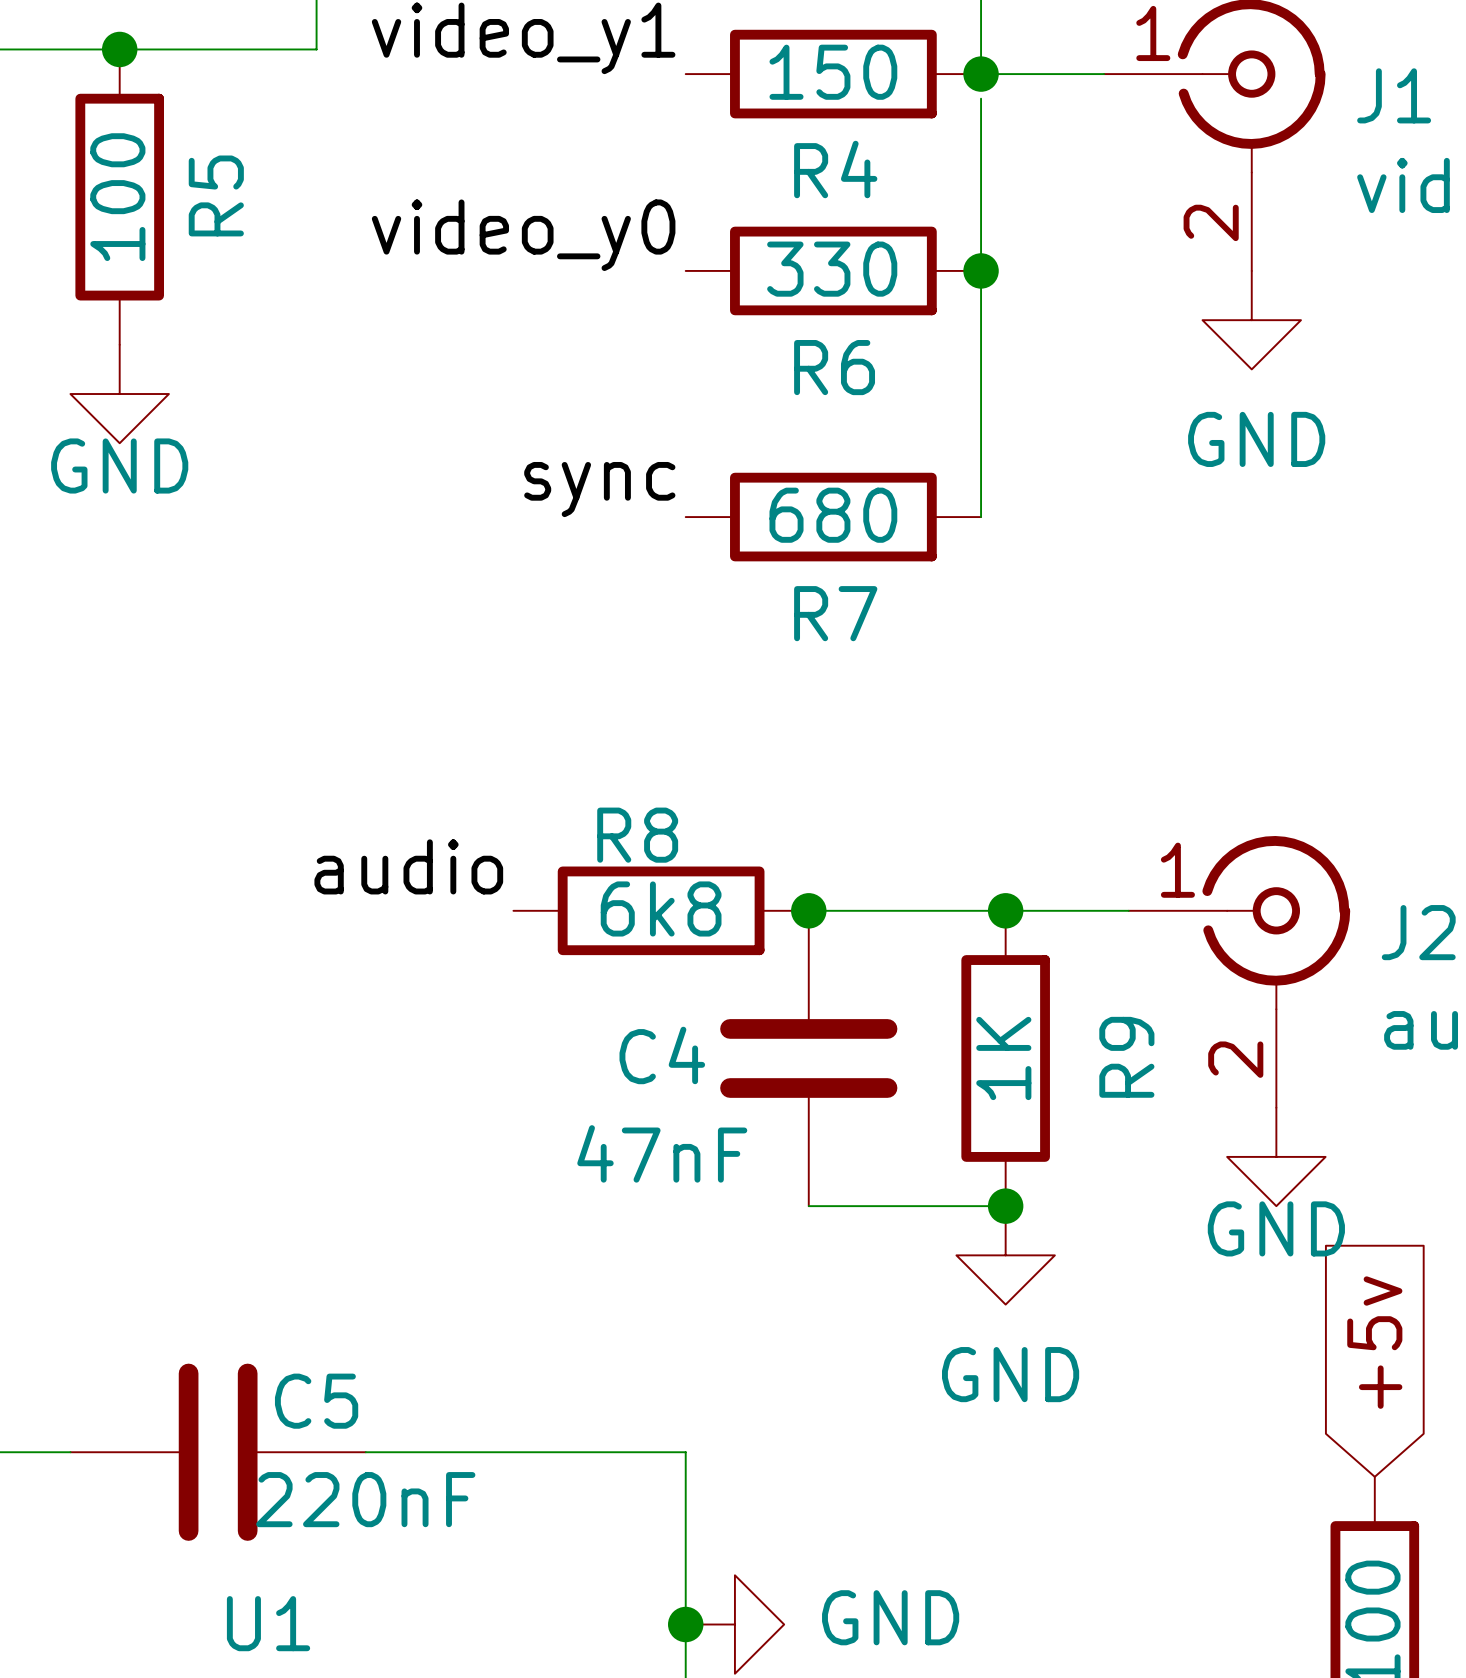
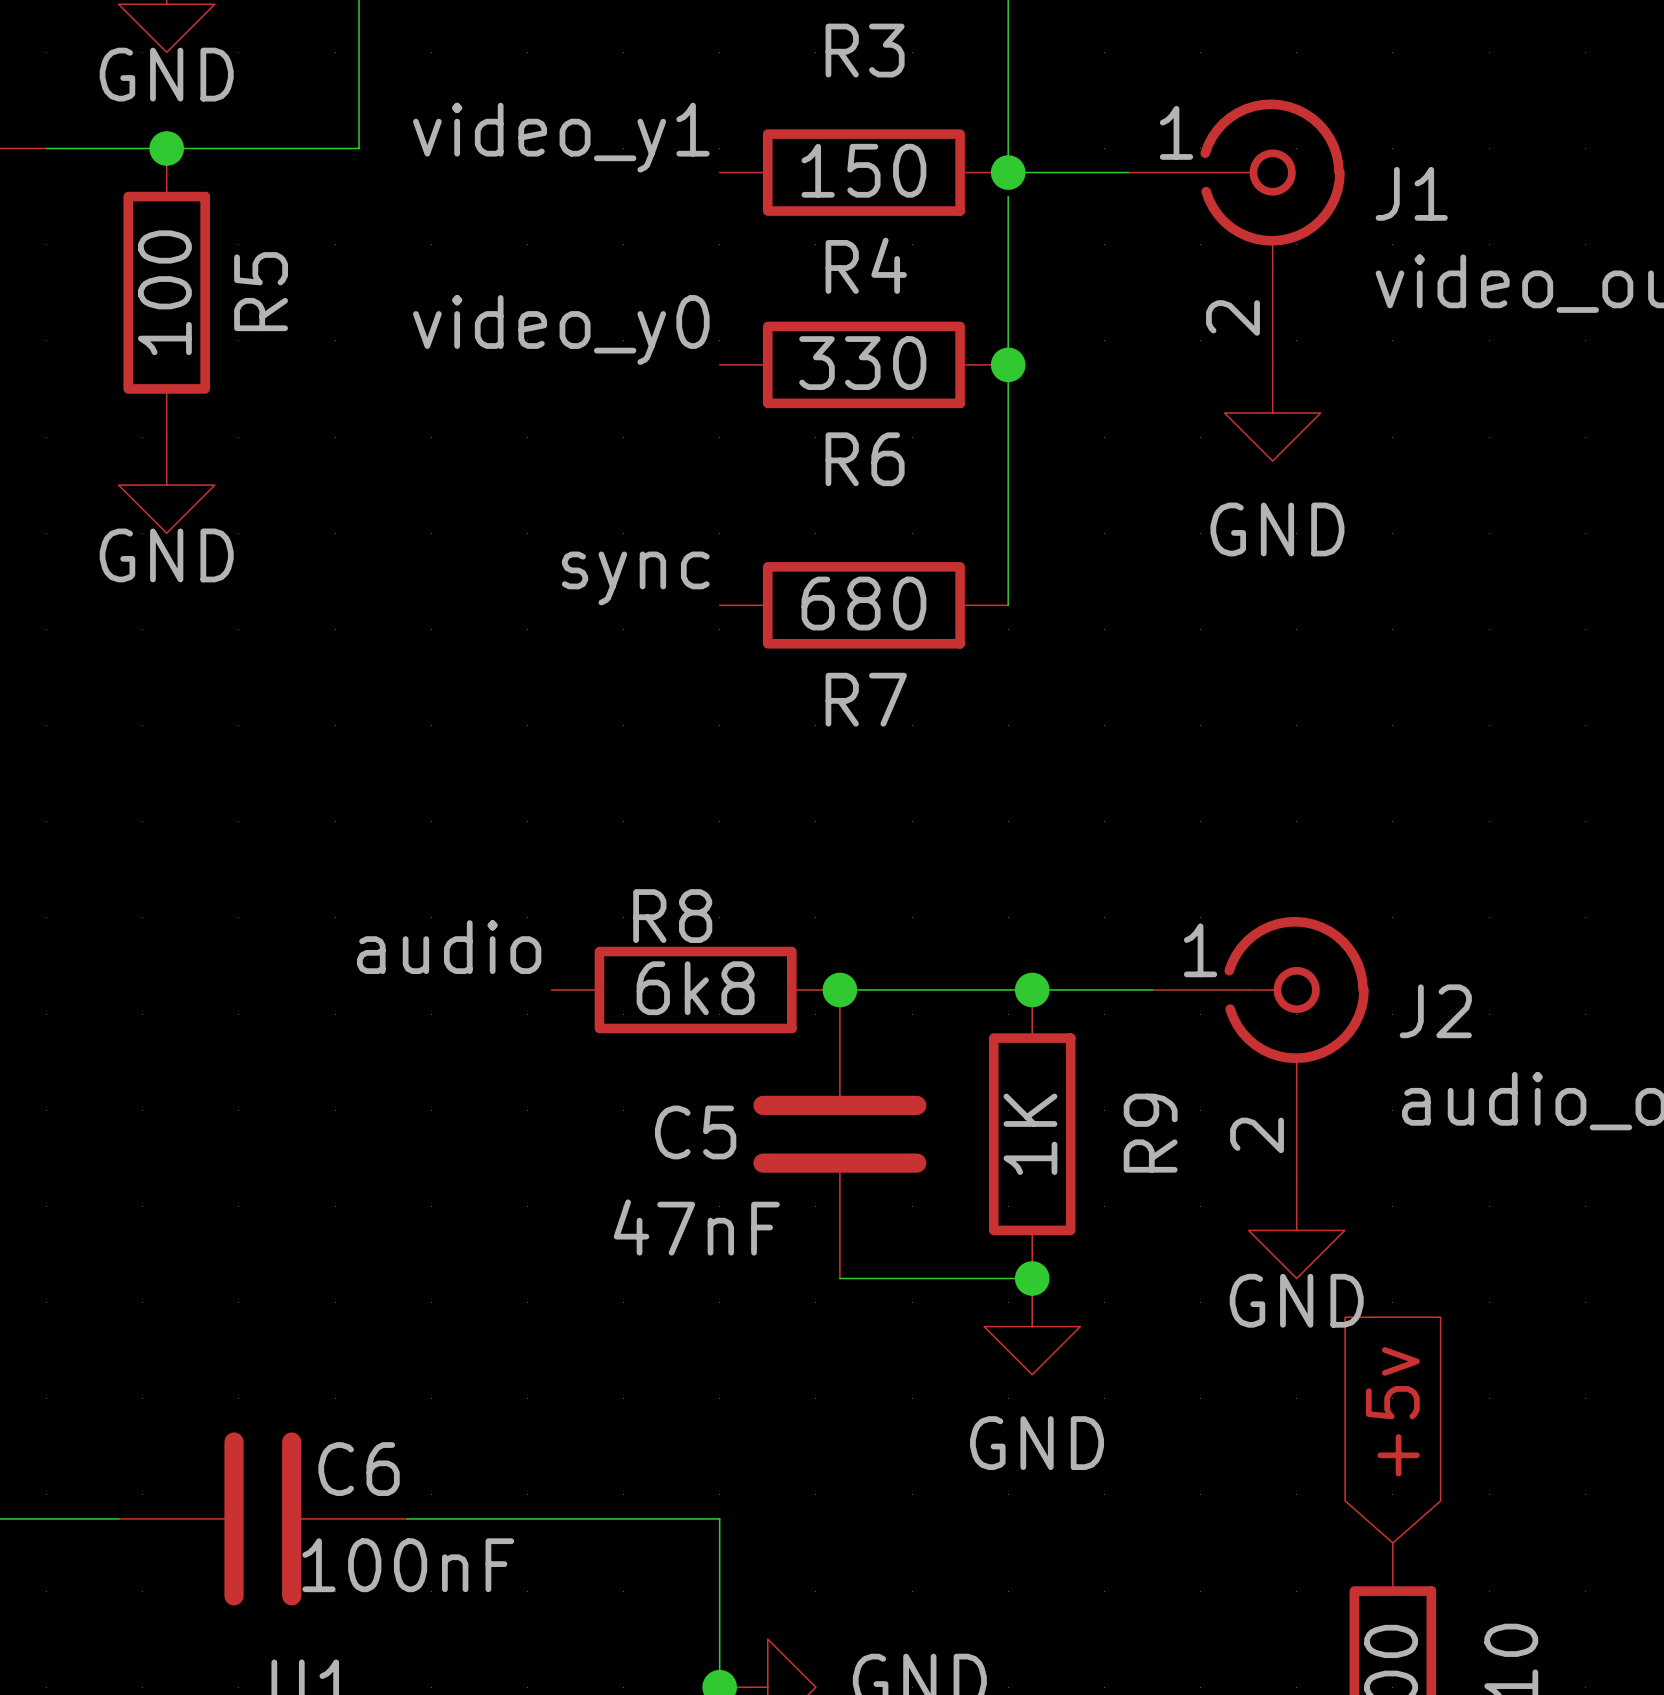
C4 name: C4 (662, 1055) -> C5 (695, 1132)
C5 name: C5 (316, 1401) -> C6 (359, 1469)
C5 value: 220nF (365, 1499) -> 100nF (408, 1565)

